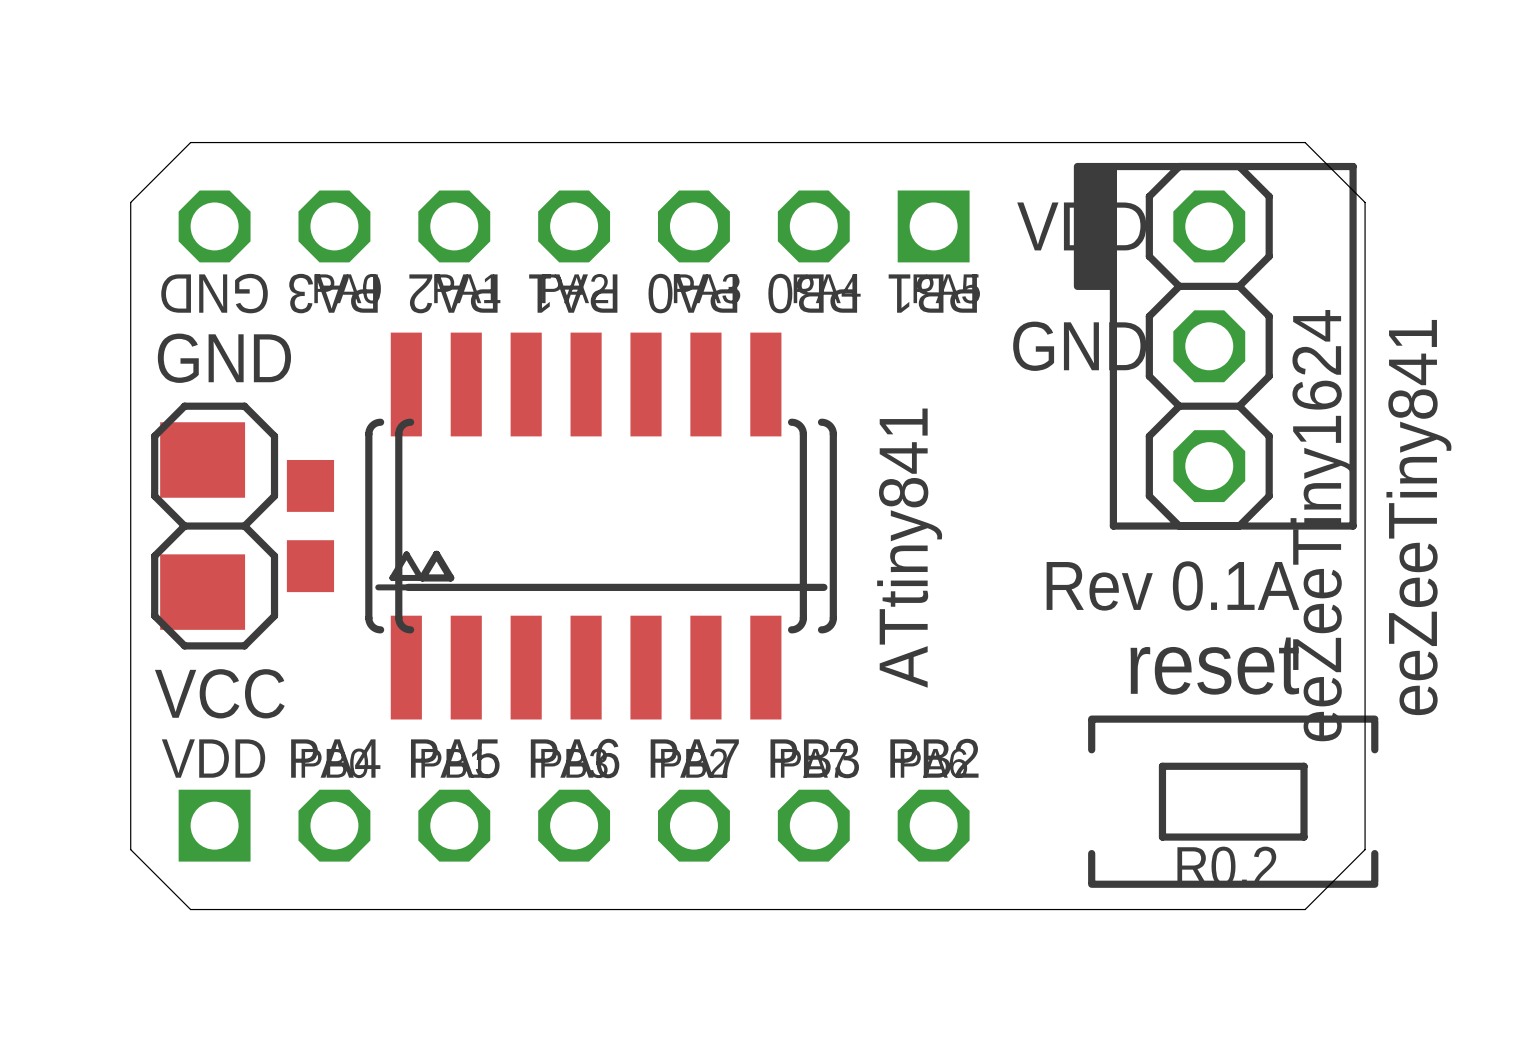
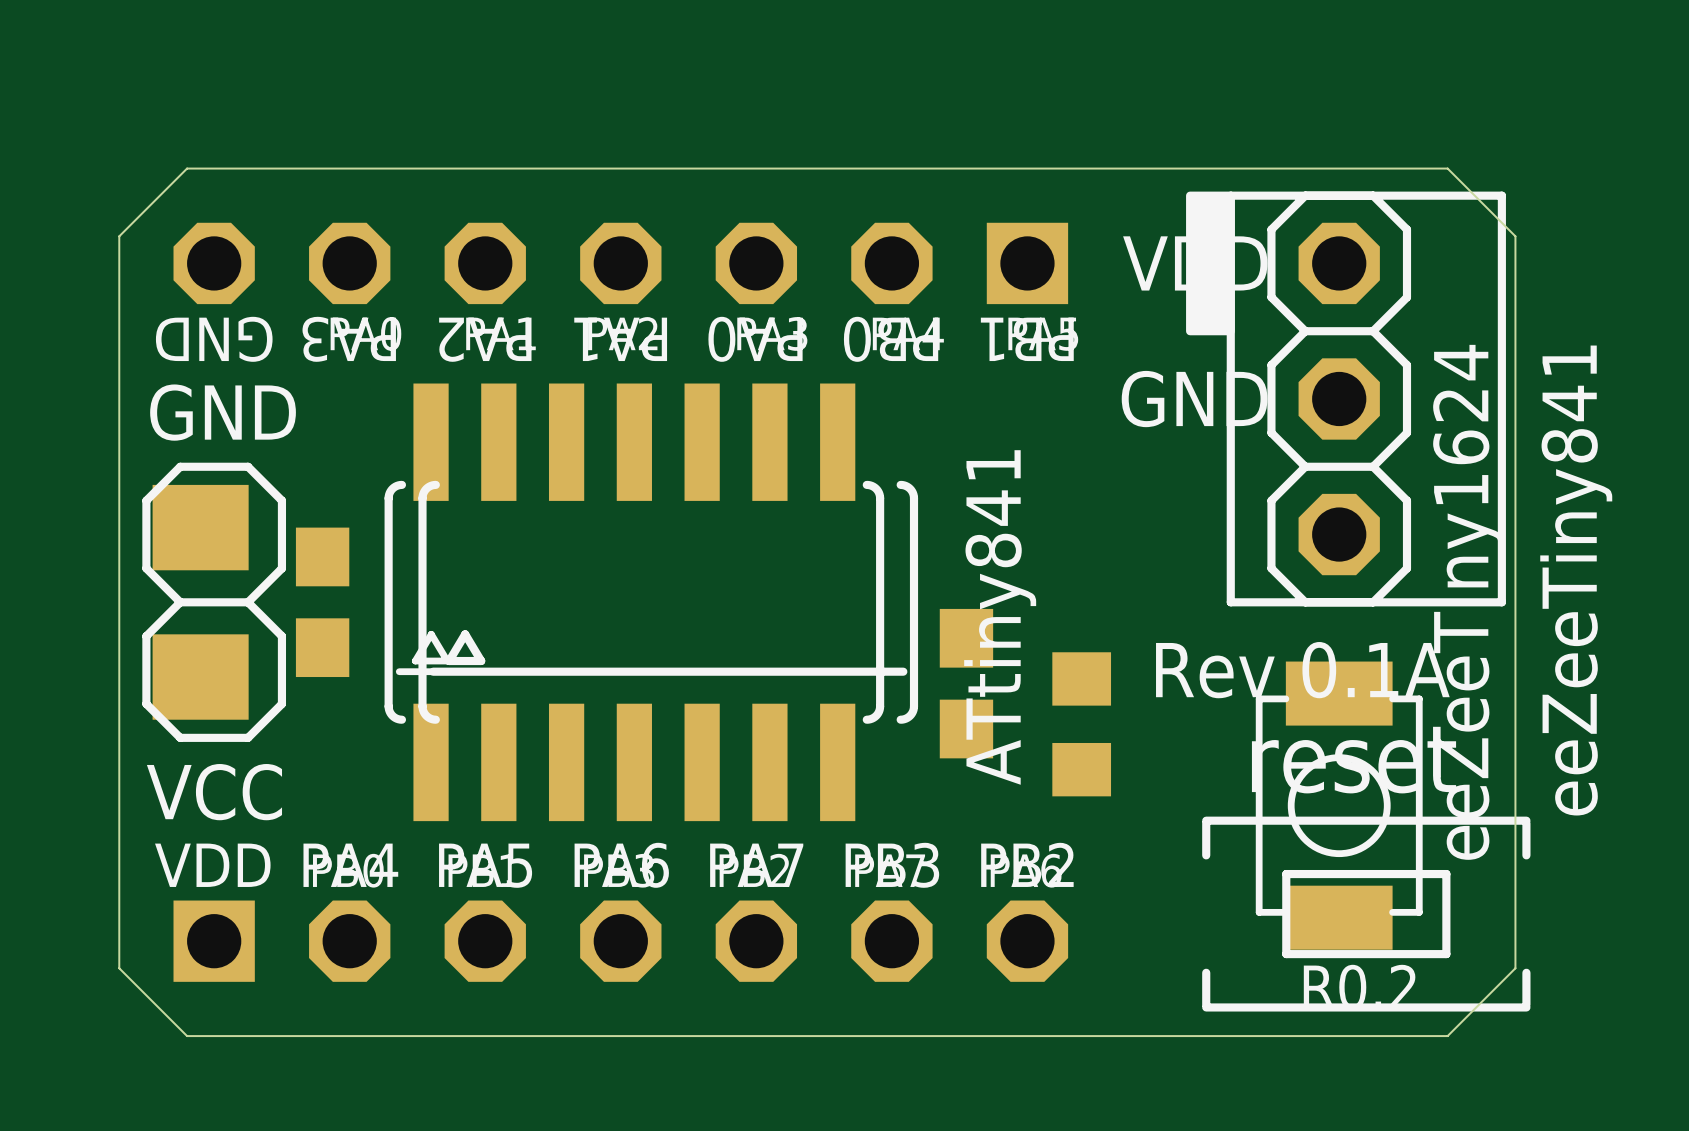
part: none -> (966, 683)
part: none -> (1081, 724)
part: none -> (1339, 805)

